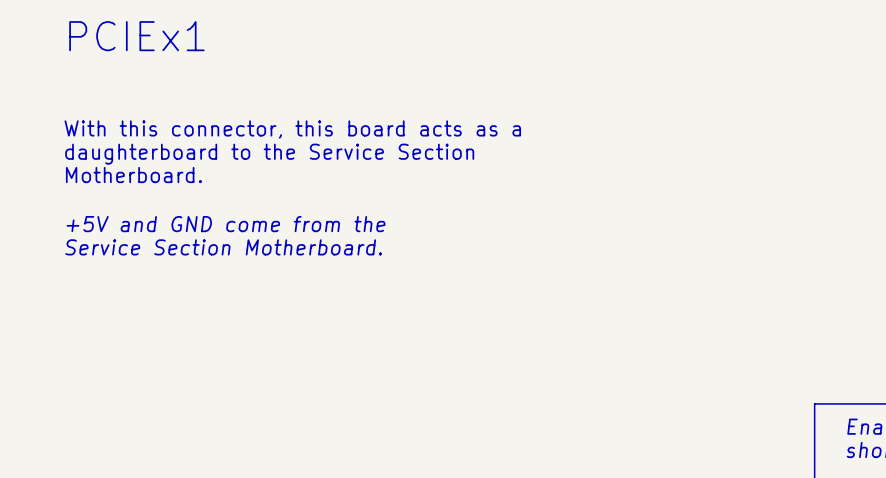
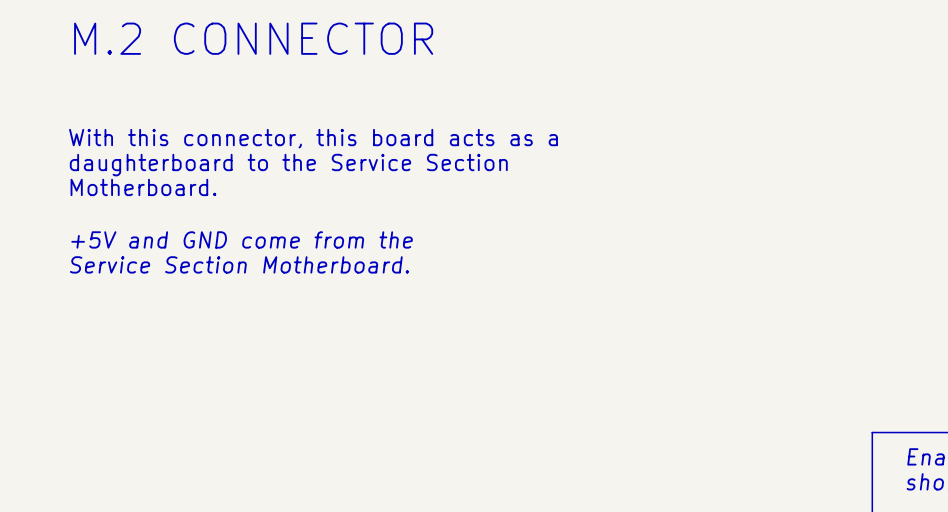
text: PCIEx1 (136, 36) -> M.2 CONNECTOR (253, 38)

